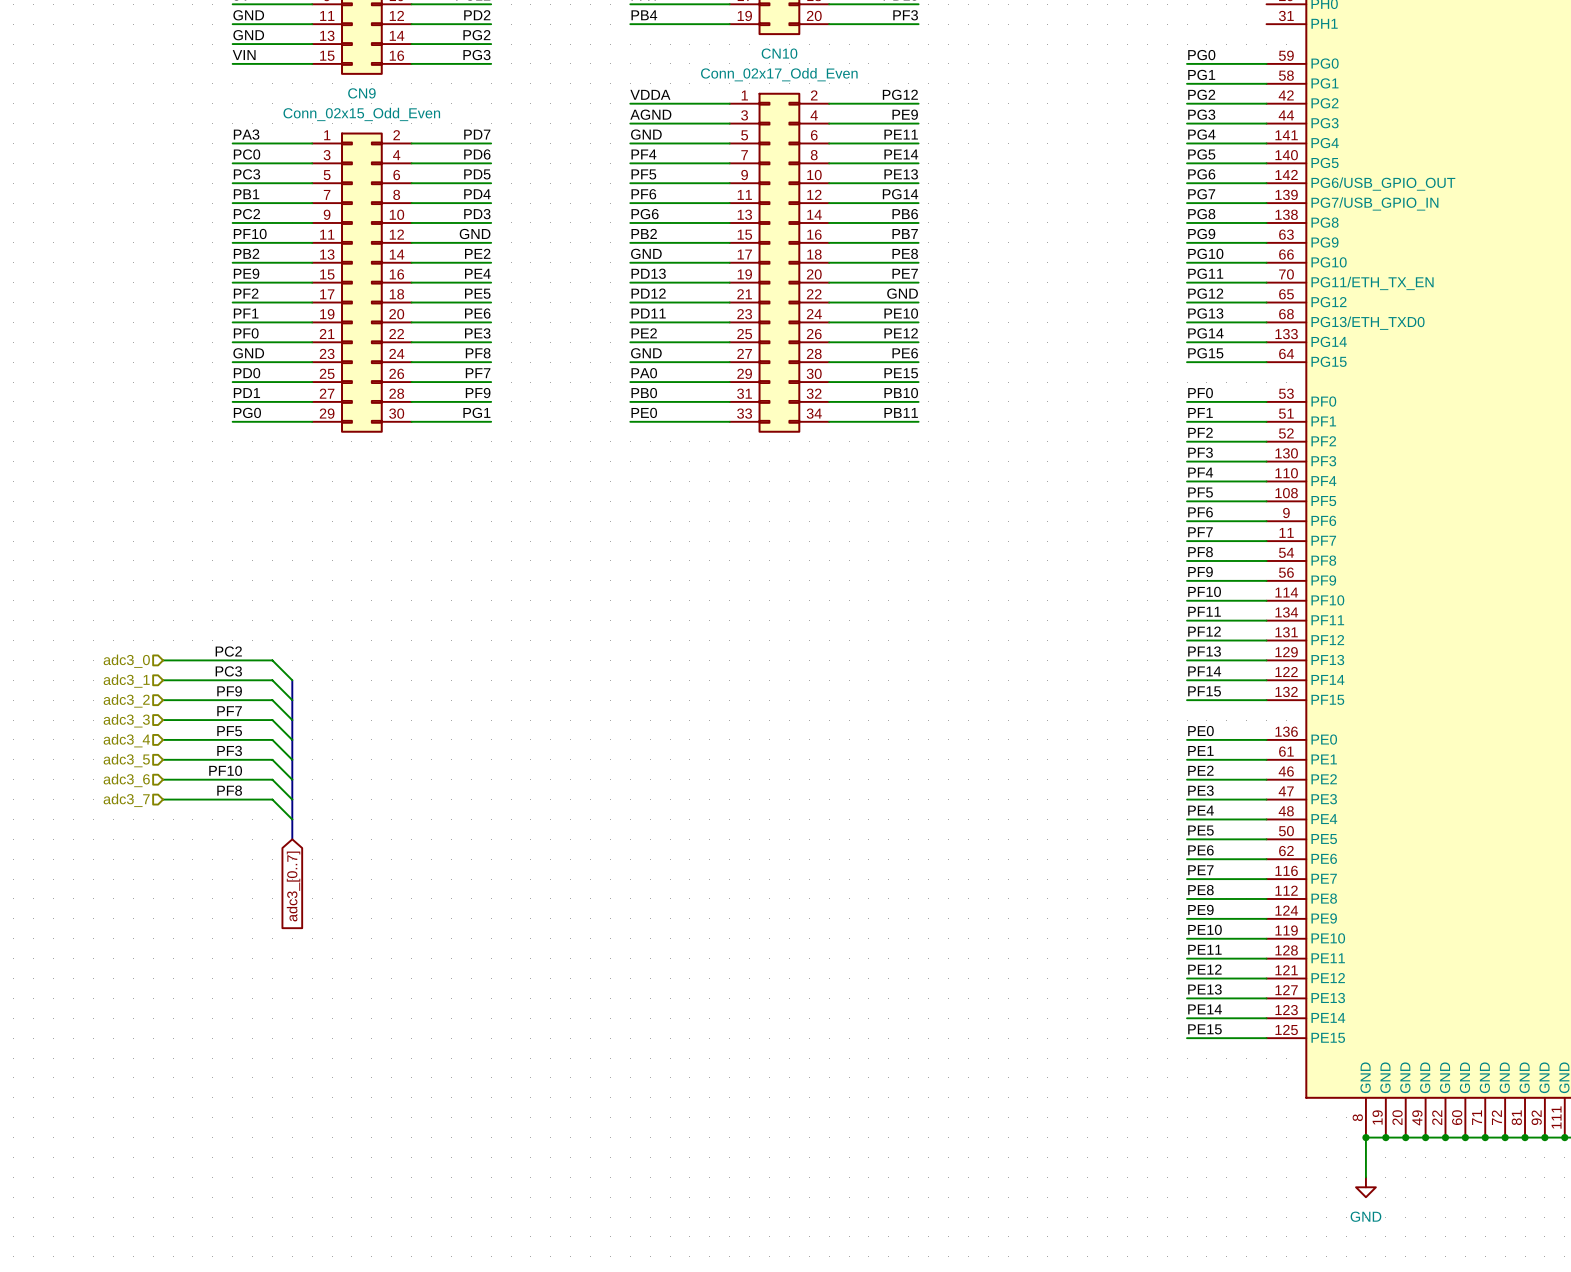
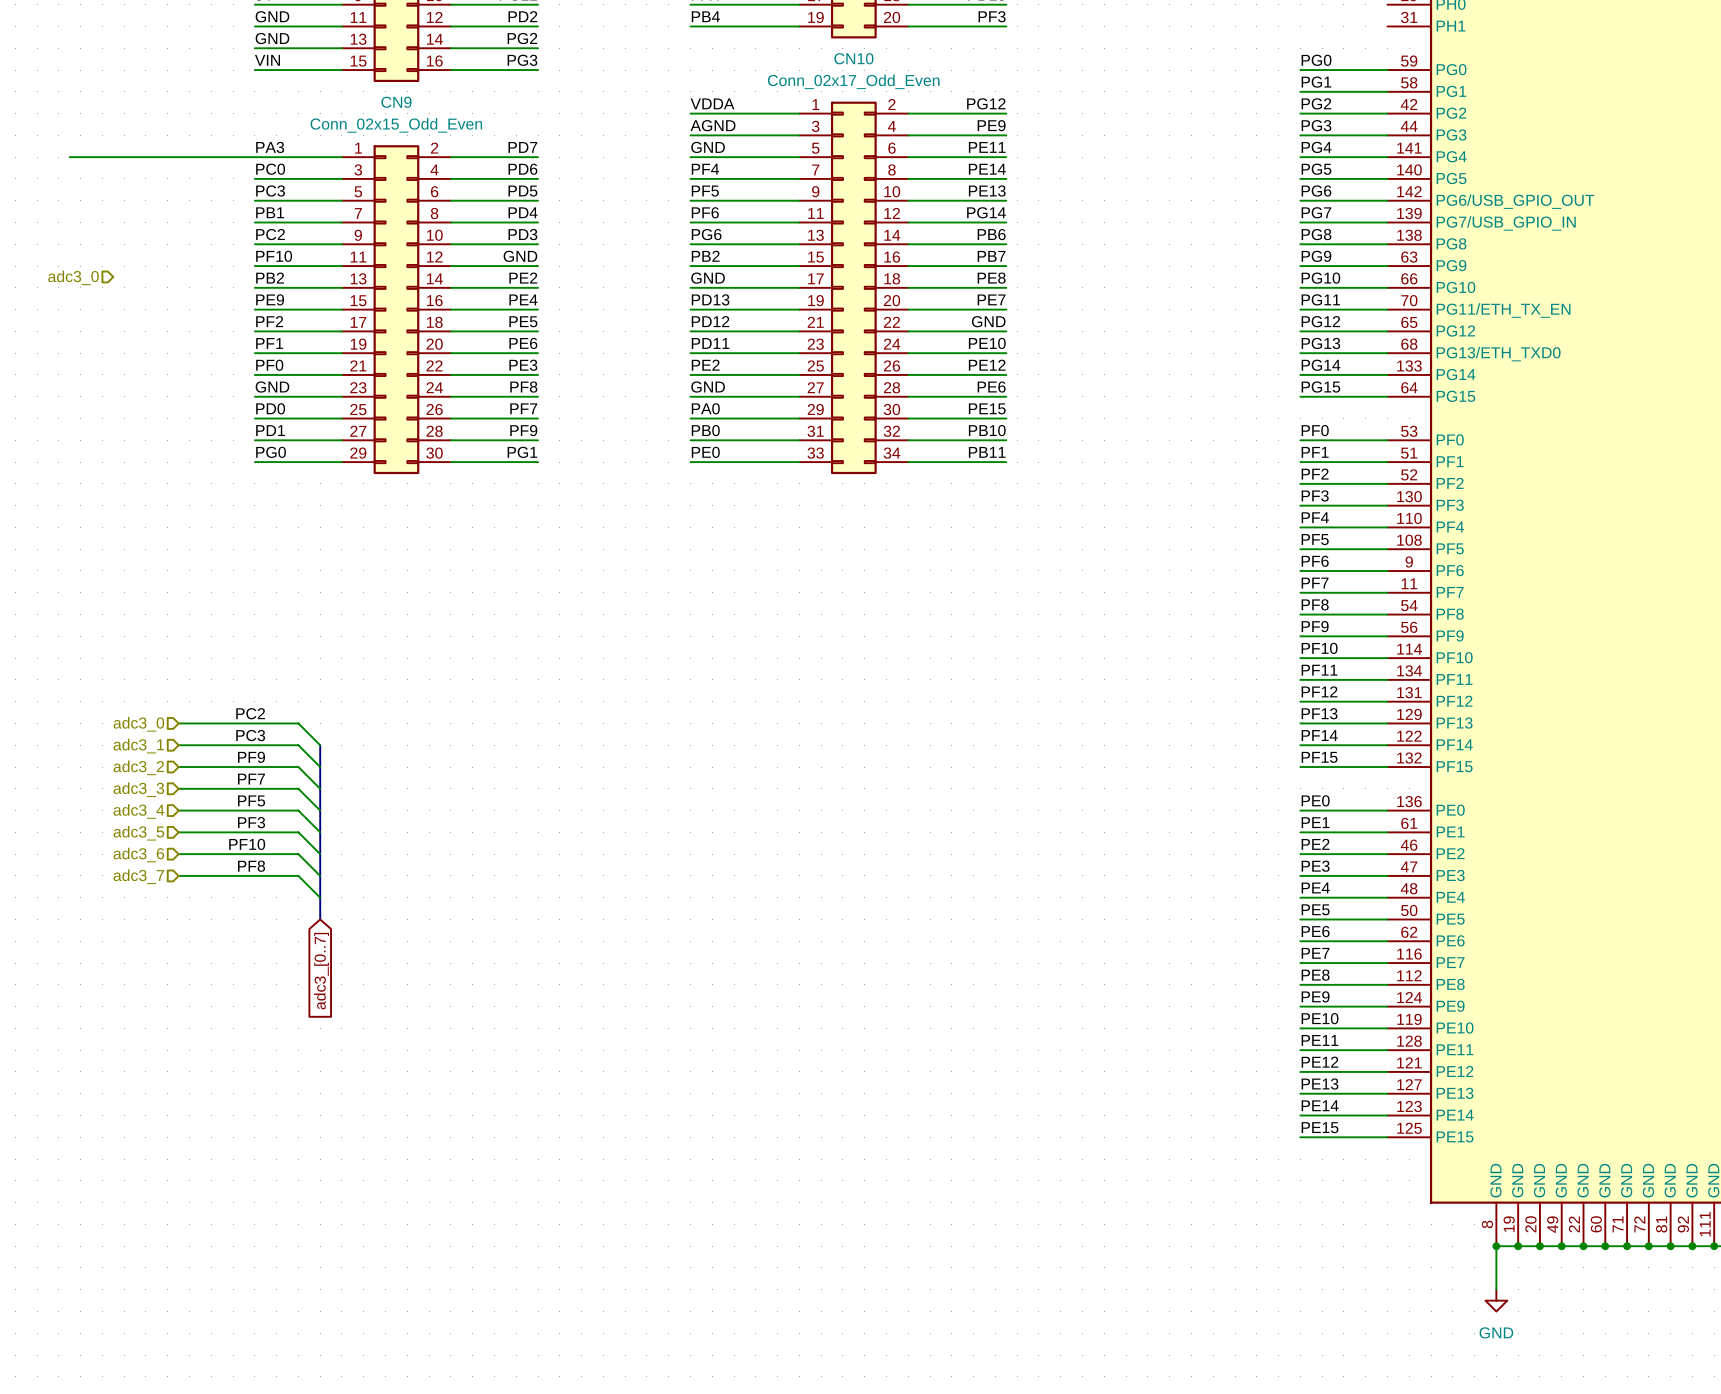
wire: none -> (69, 157) (254, 157)
hierarchical label: none -> adc3_0 (73, 277)

